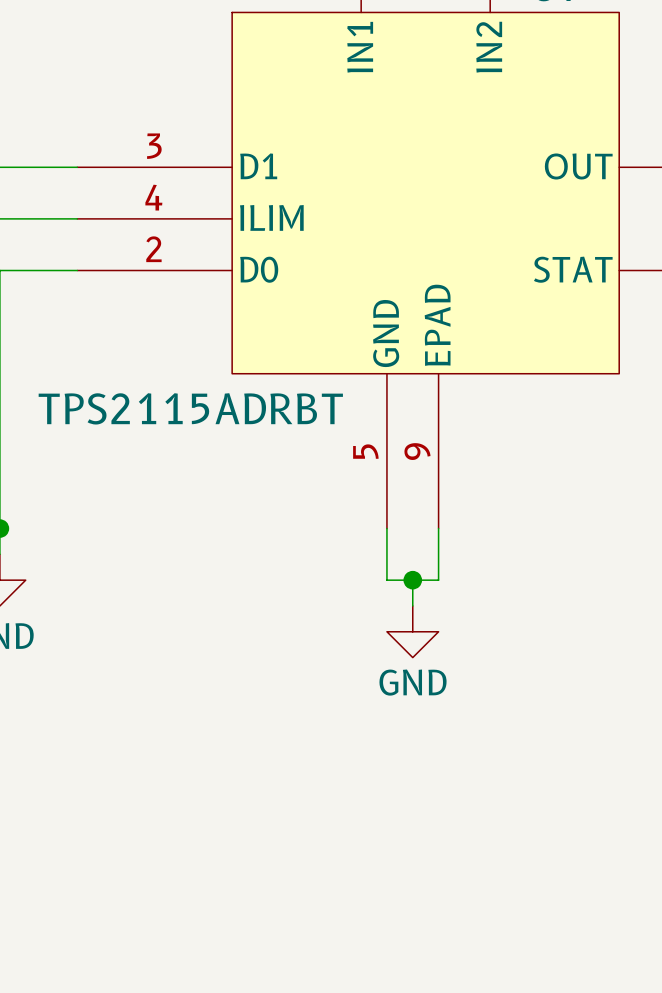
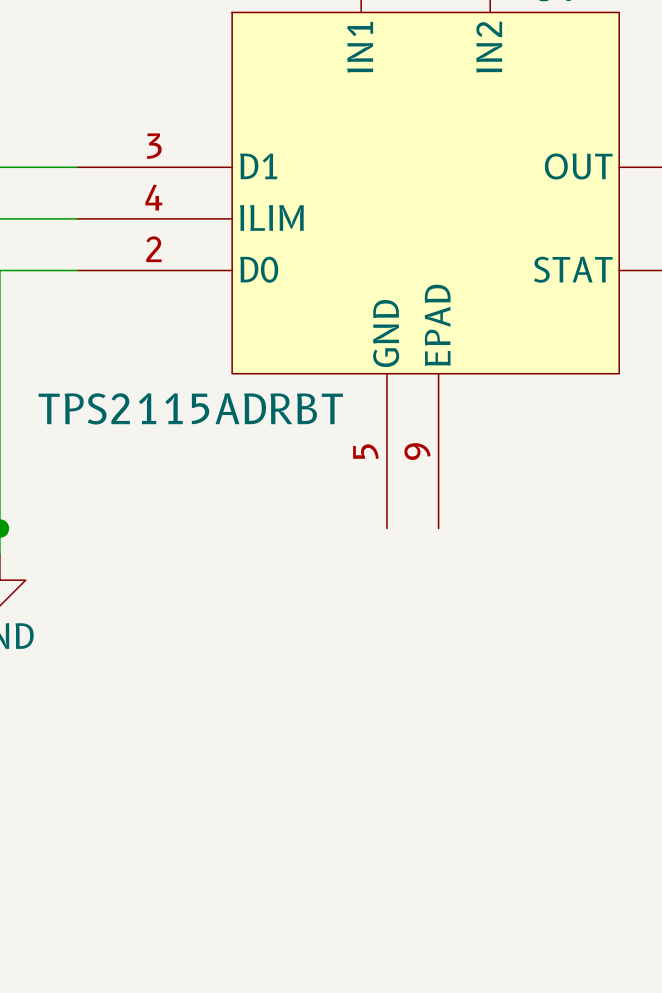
wire: (386, 528) (386, 580) (438, 580) (438, 528) -> none
wire: (412, 580) (412, 605) -> none
junction: (412, 580) -> none
power symbol: GND (412, 631) -> none

